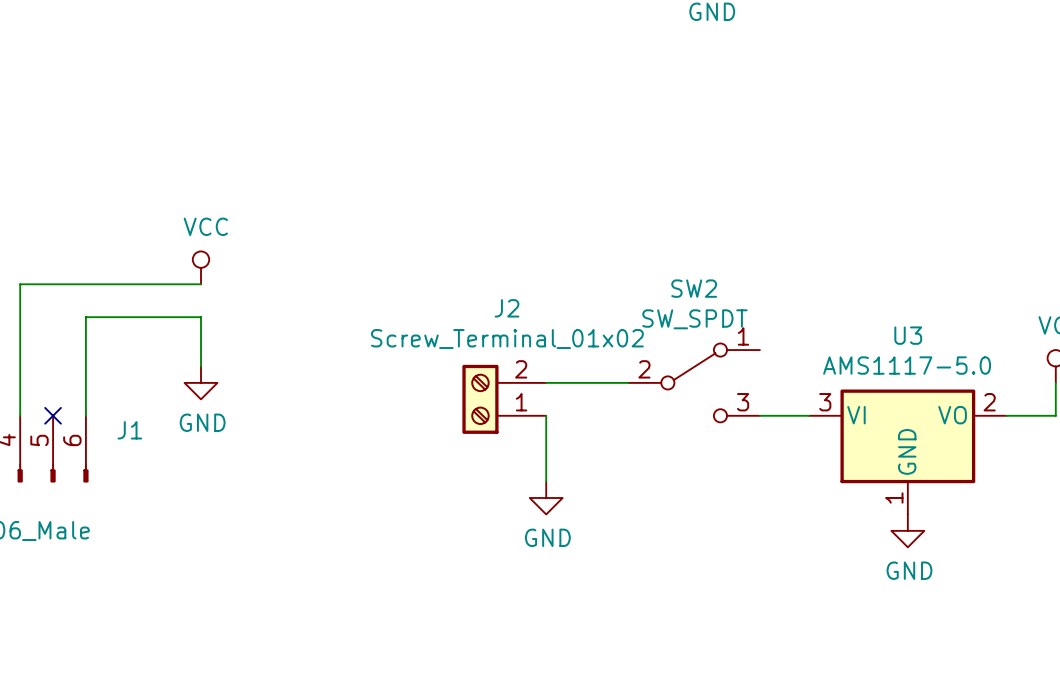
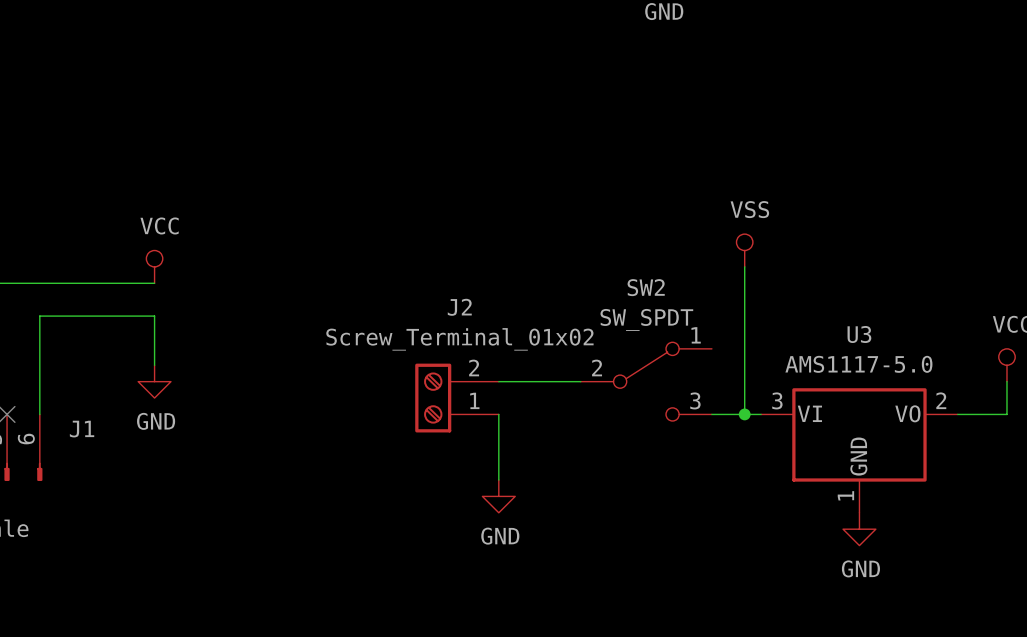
power symbol: none -> VSS (744, 250)
wire: none -> (744, 266) (744, 414)
junction: none -> (744, 414)

